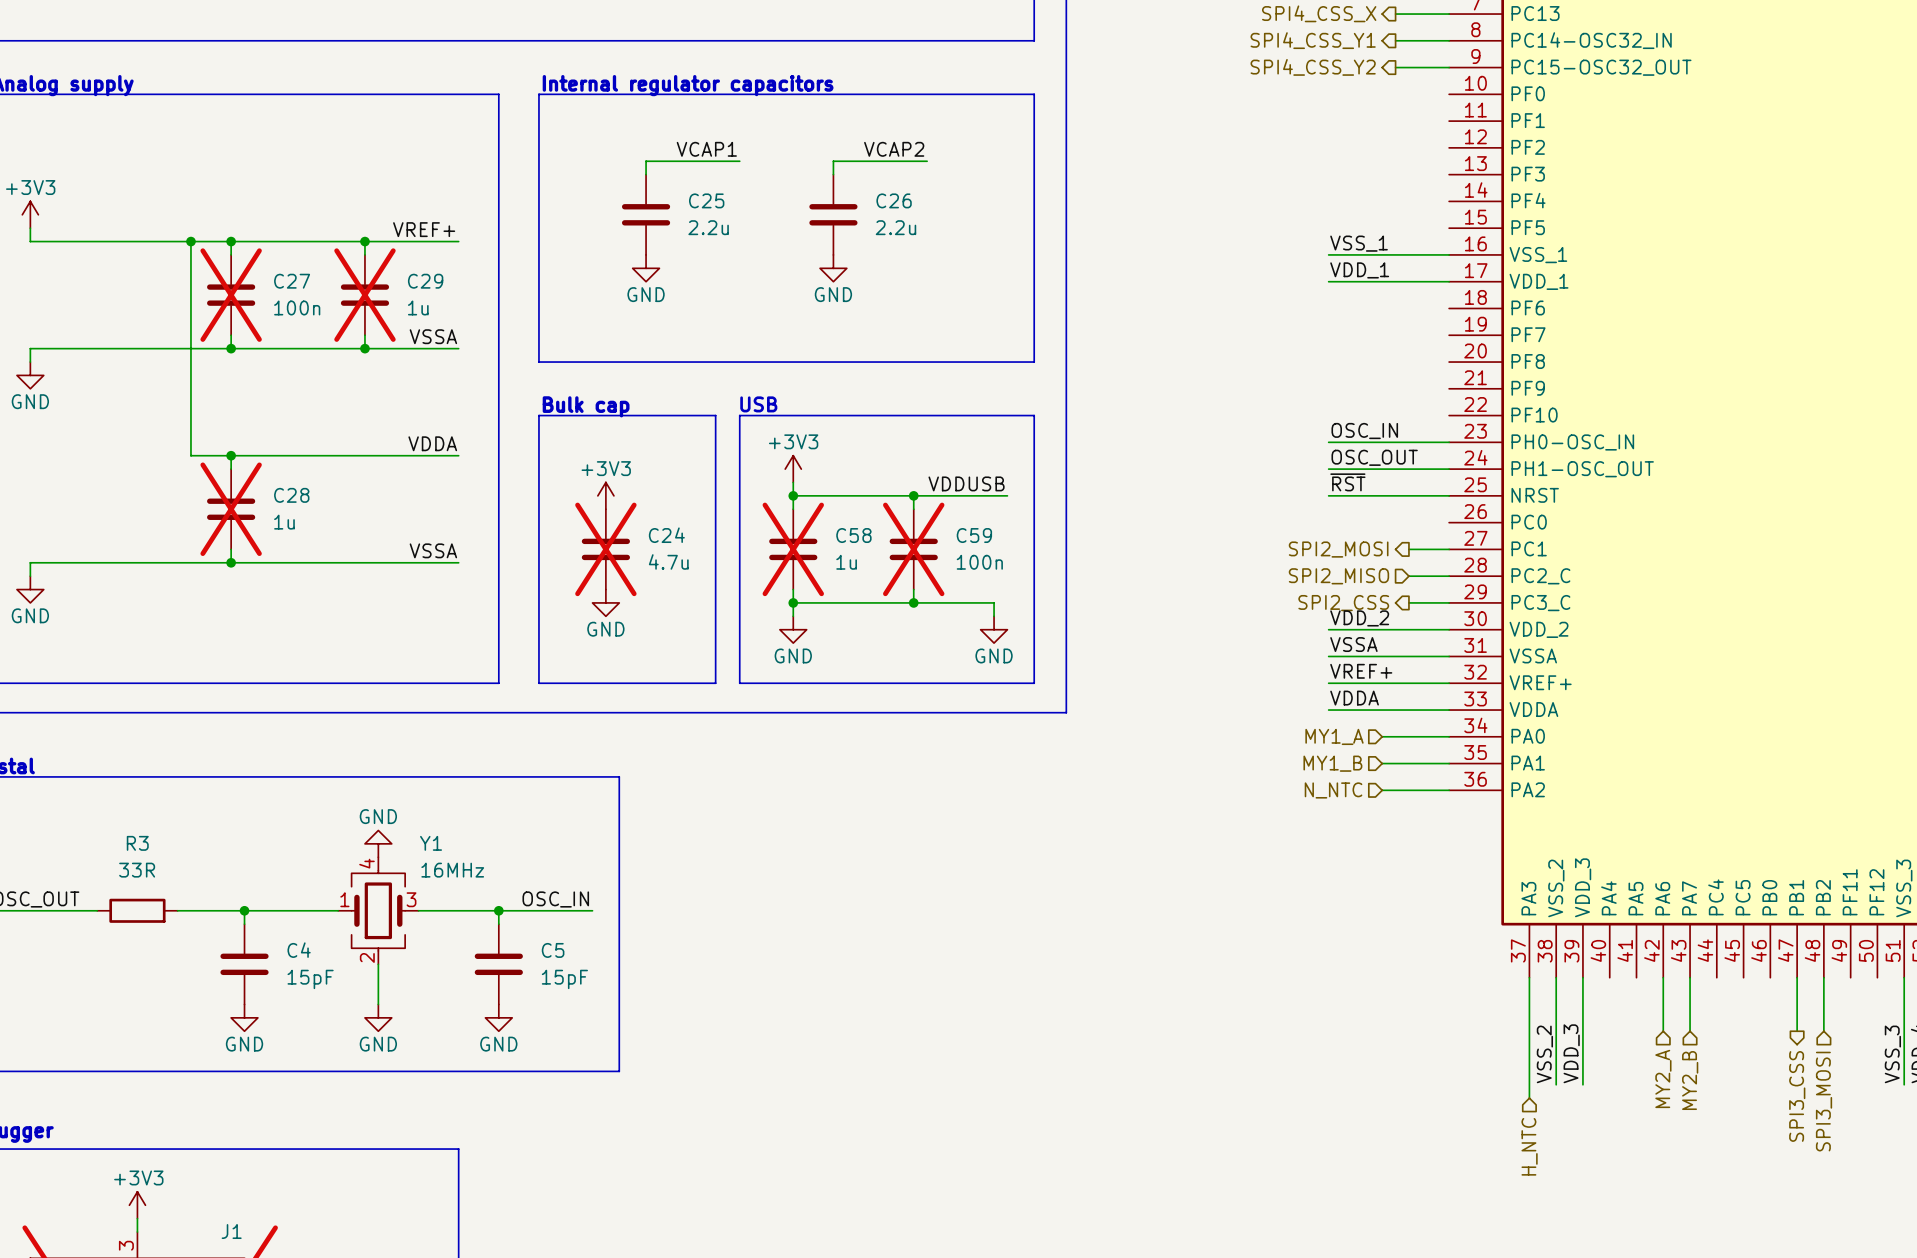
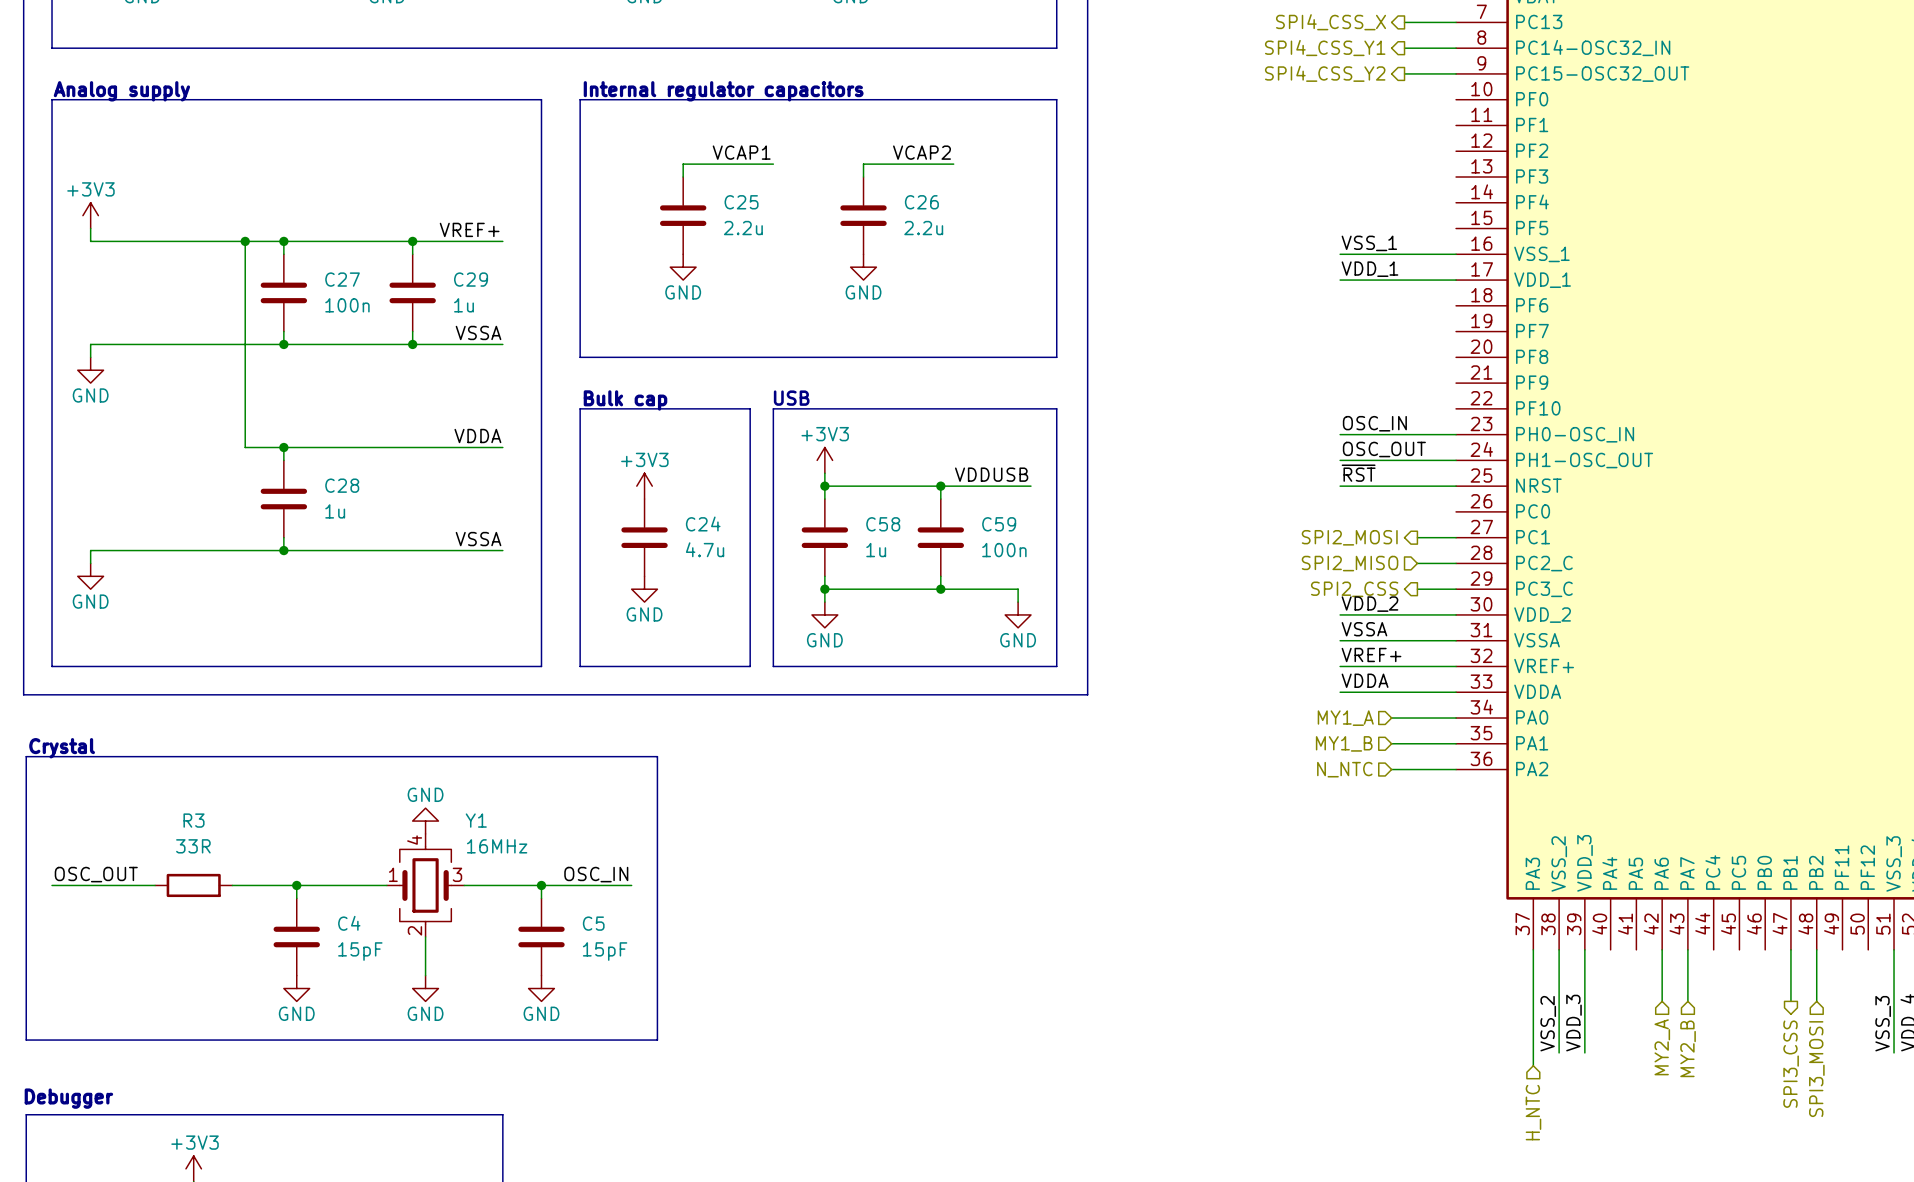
C27 do-not-place cross: (231, 295) -> none
C29 do-not-place cross: (364, 295) -> none
C28 do-not-place cross: (231, 509) -> none
C24 do-not-place cross: (605, 549) -> none
C58 do-not-place cross: (793, 549) -> none
C59 do-not-place cross: (913, 549) -> none

